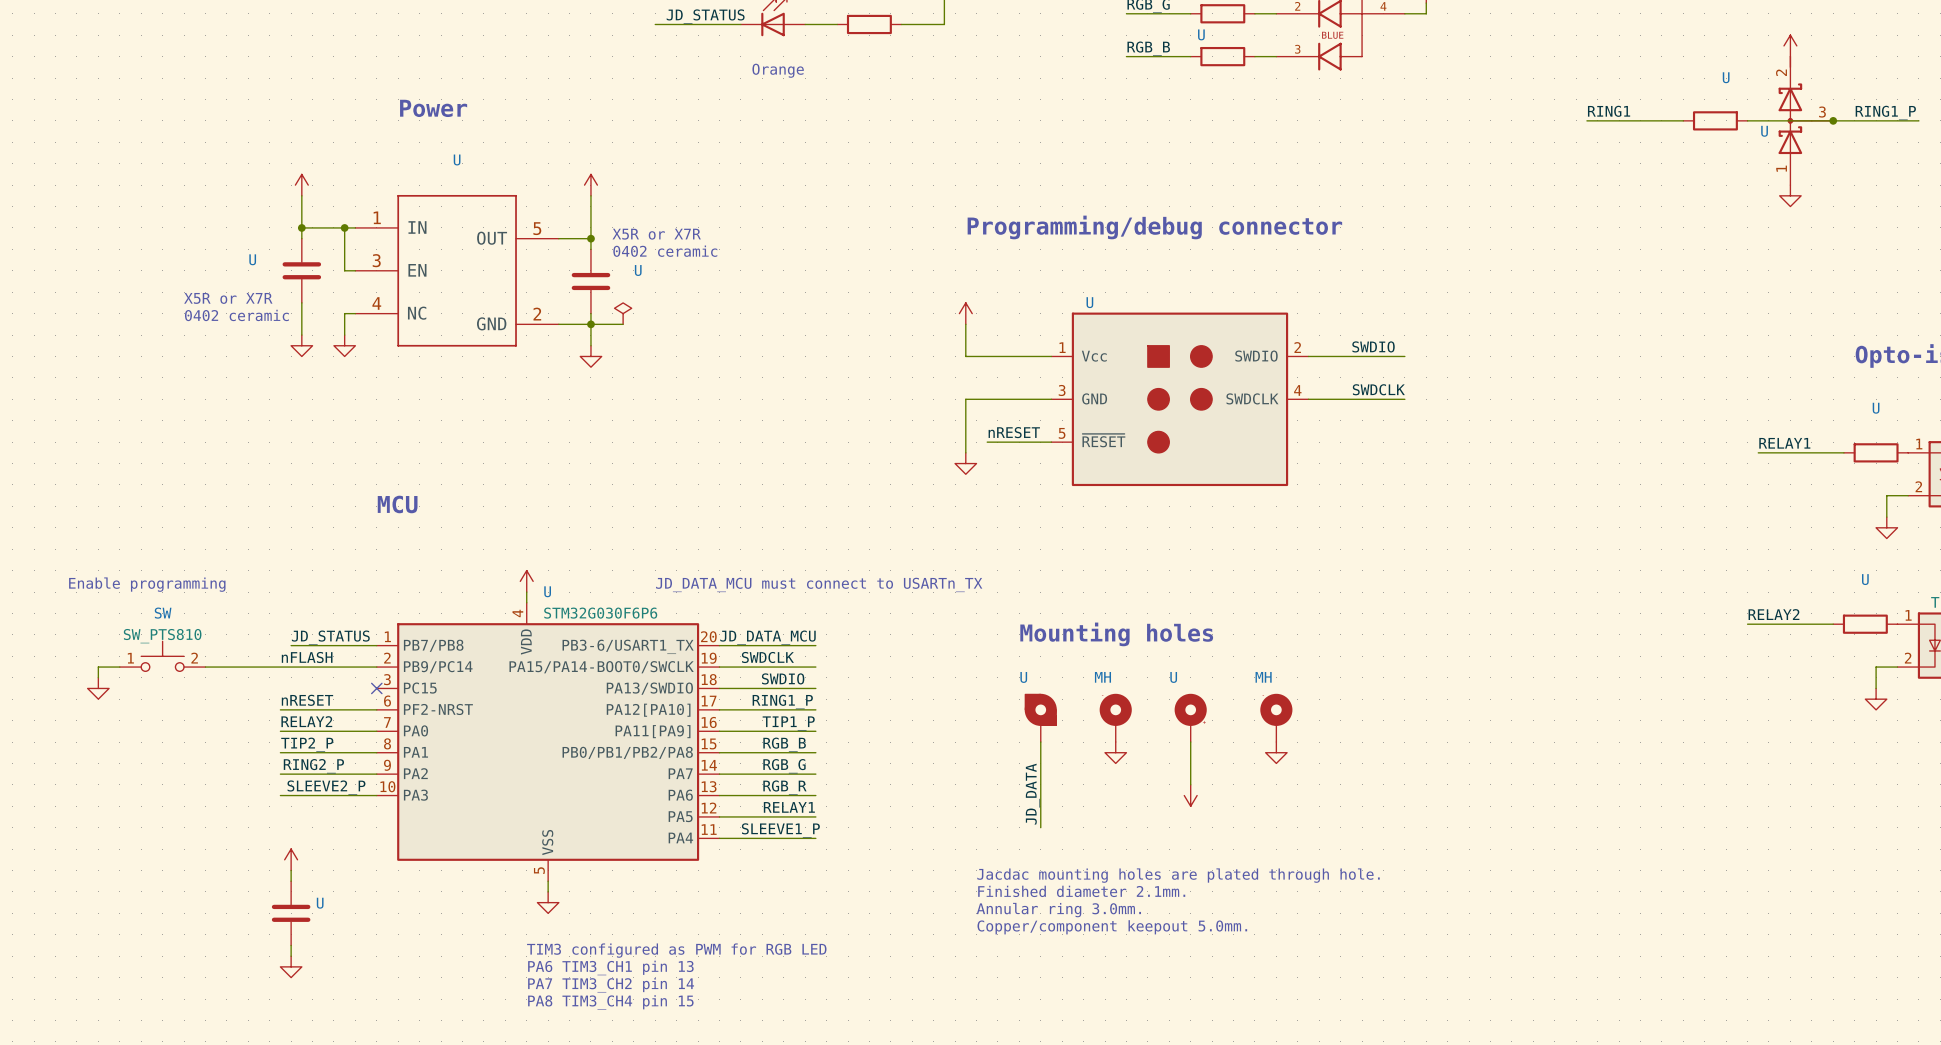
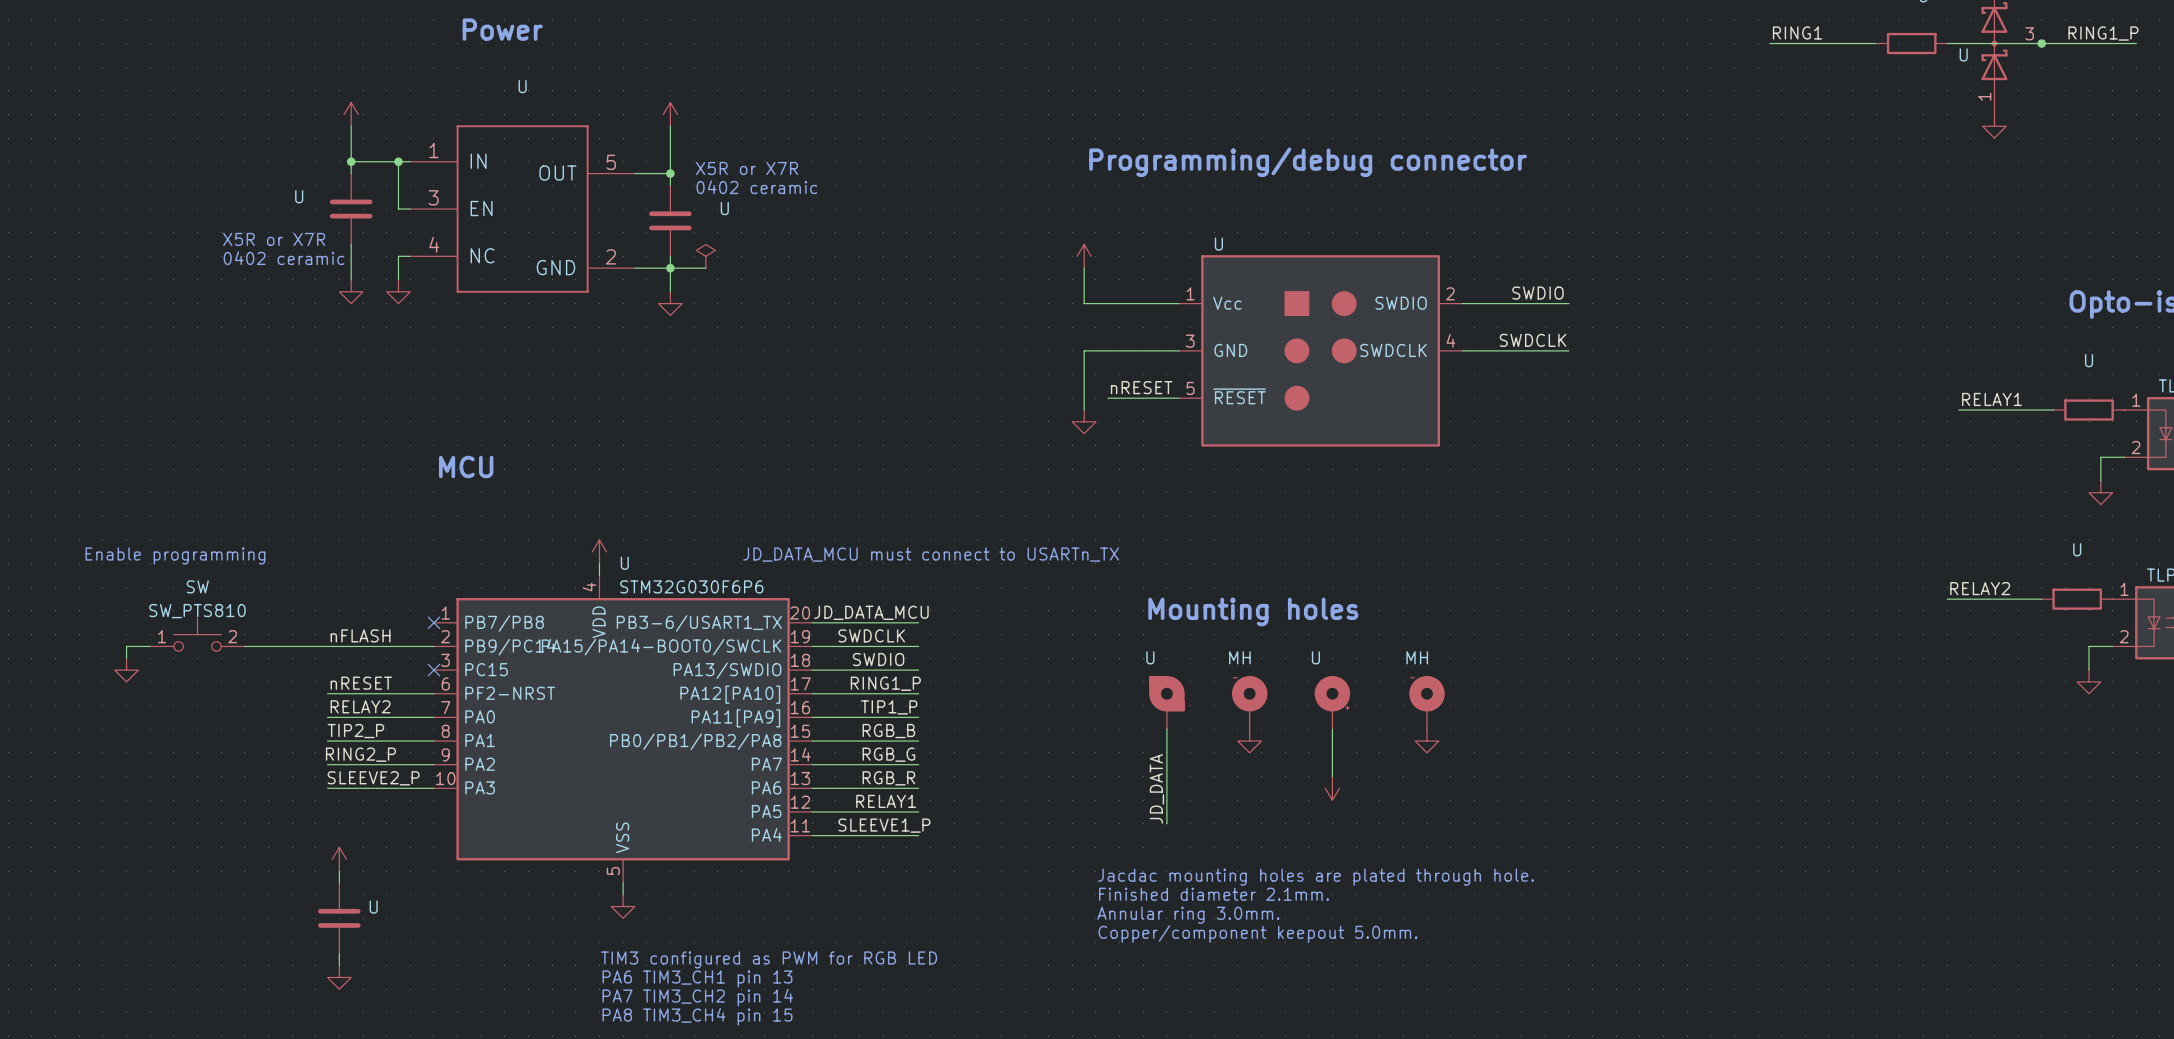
label: JD_STATUS (330, 637) -> none
wire: (291, 645) (376, 645) -> none
no-connect mark: none -> (433, 622)

